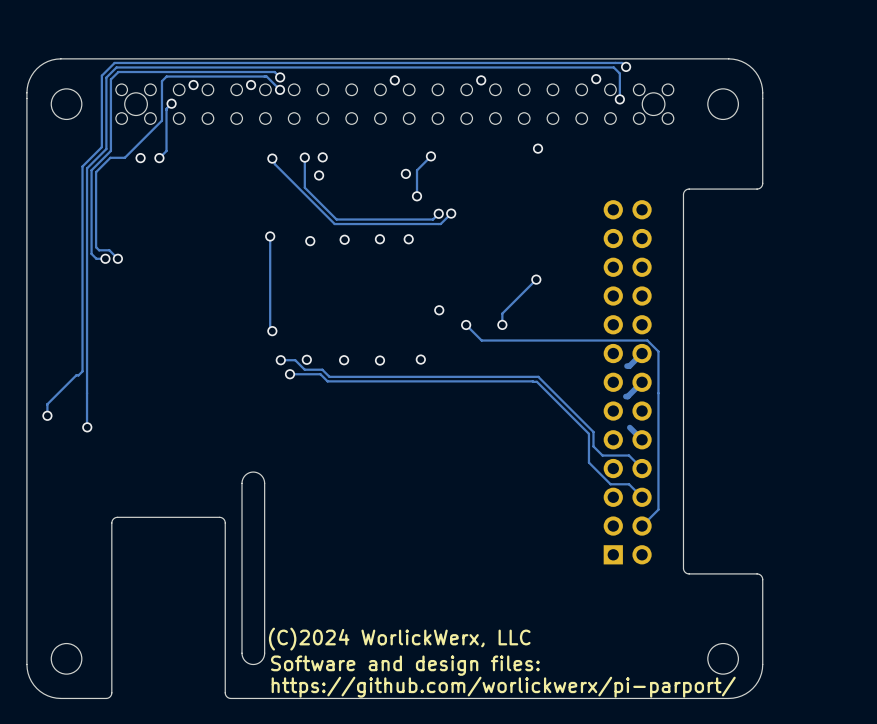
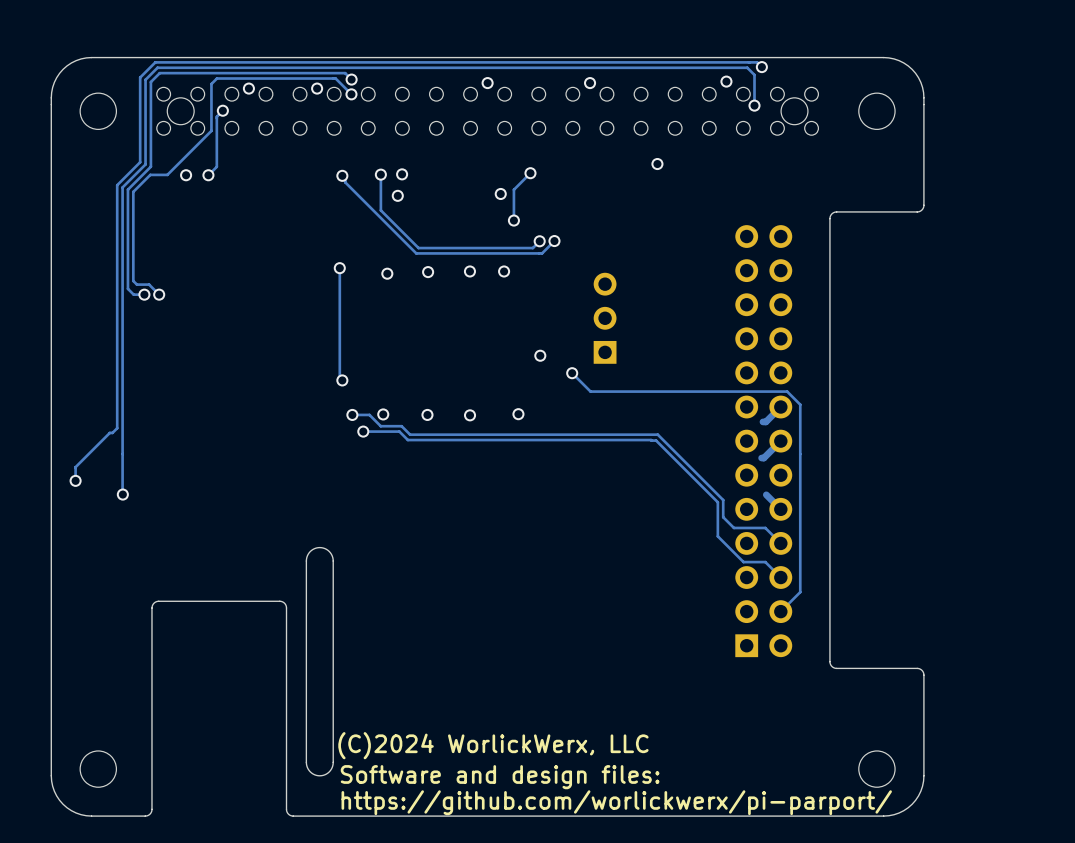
part: none -> (605, 318)
track: (536, 279) (502, 313) (502, 324) -> none
via: (536, 279) -> none
via: (502, 324) -> none

